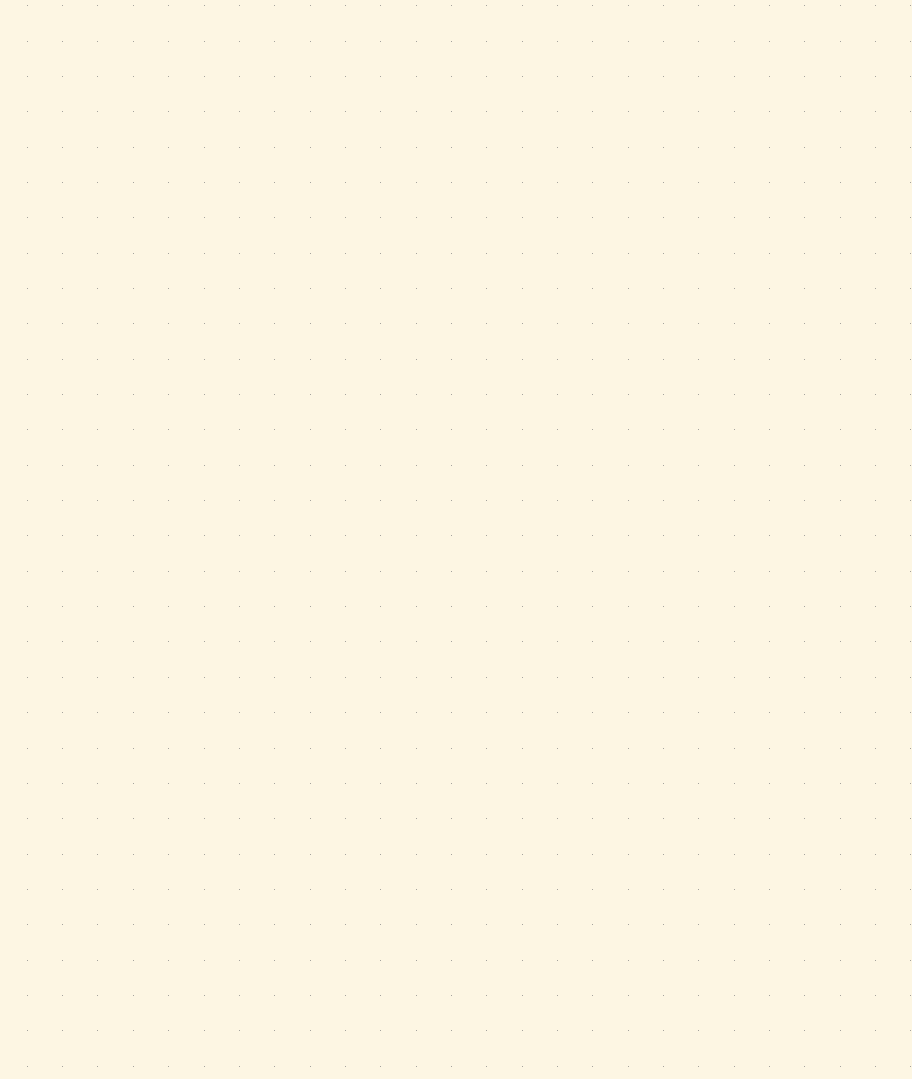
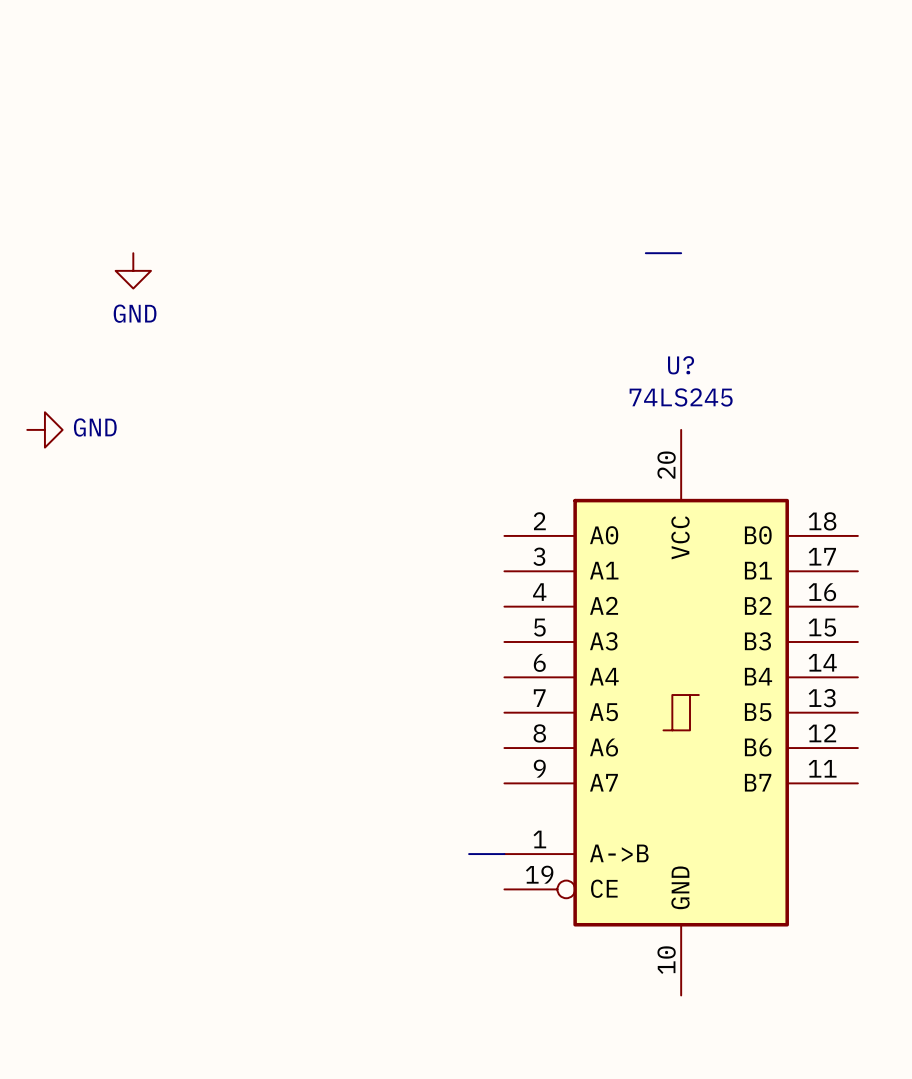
wire: none -> (645, 253) (681, 253)
power symbol: none -> GND (133, 270)
power symbol: none -> GND (44, 429)
U?: none -> 74LS245 (681, 712)
wire: none -> (469, 854) (504, 854)

